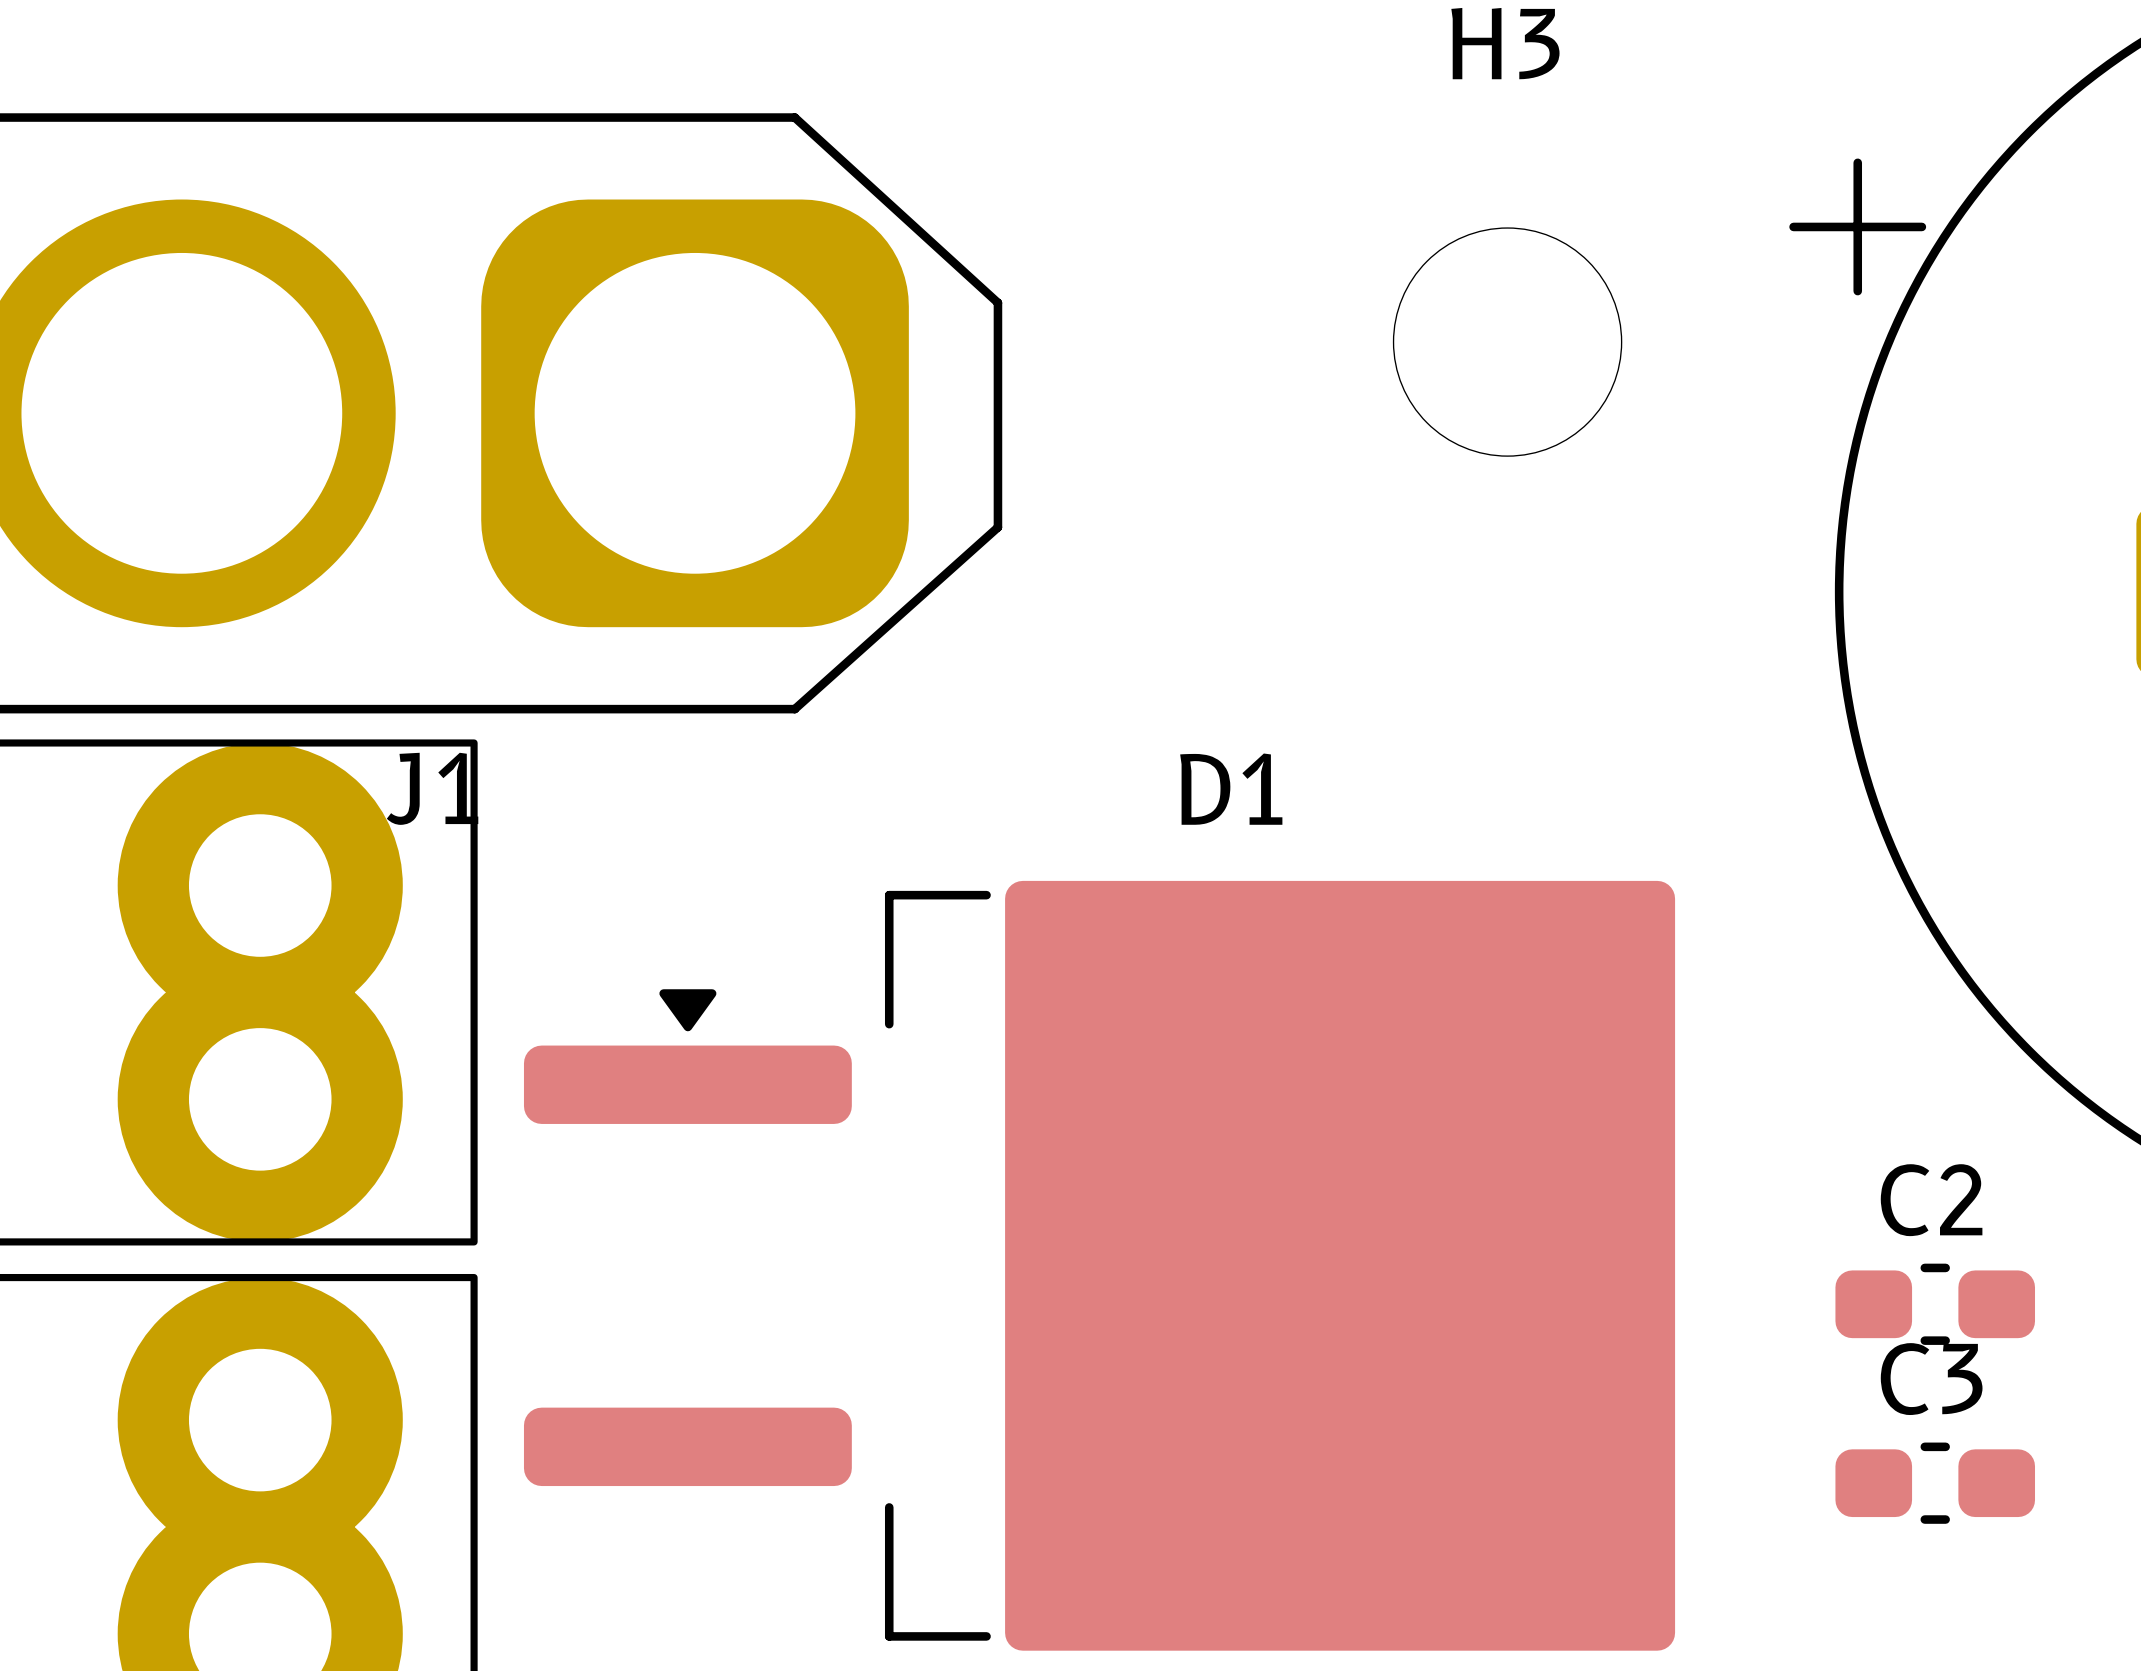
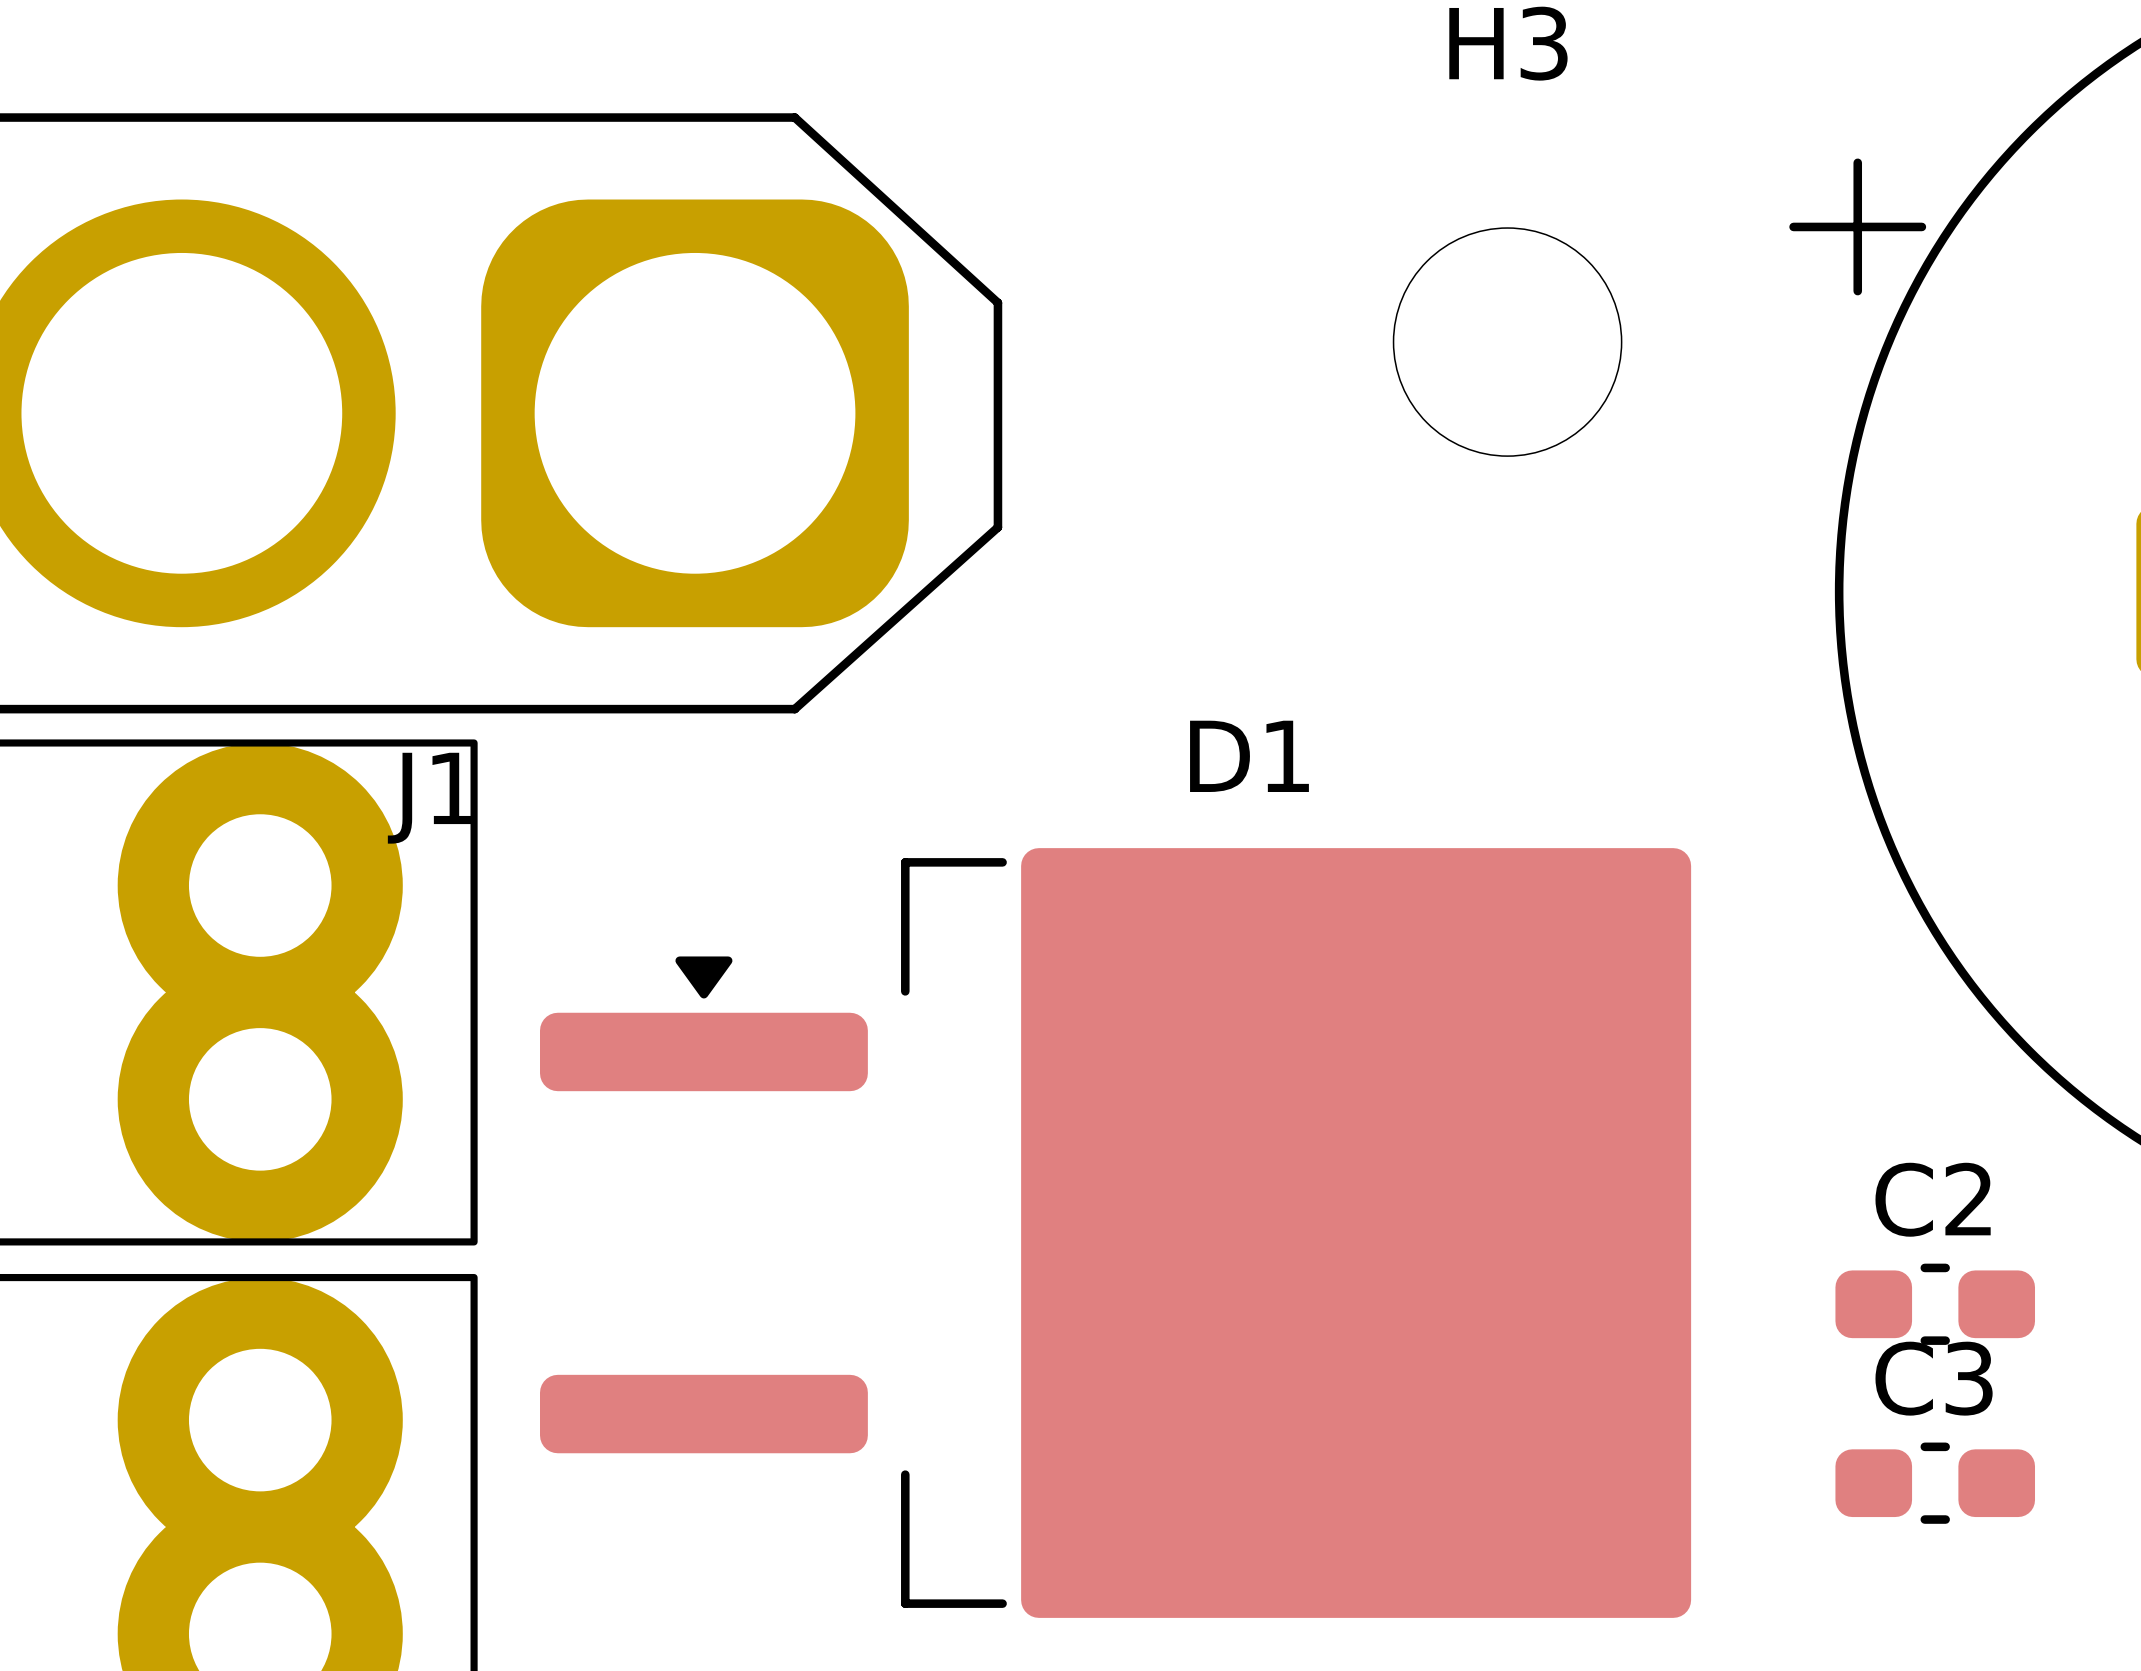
D1 position: (1099, 1265) -> (1115, 1233)

